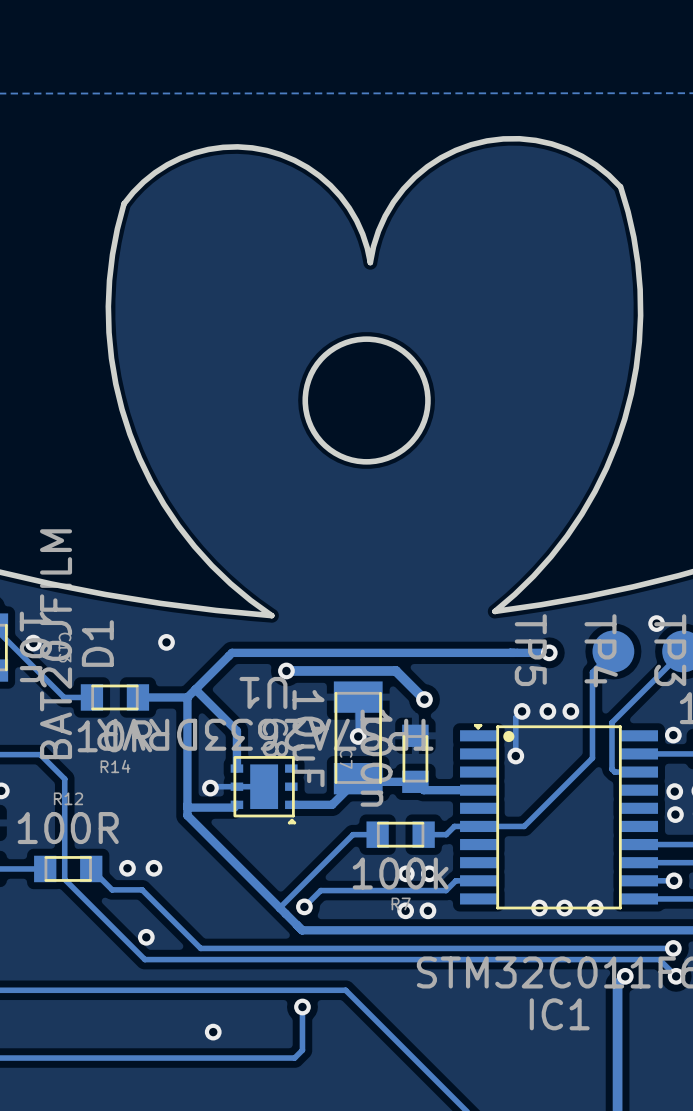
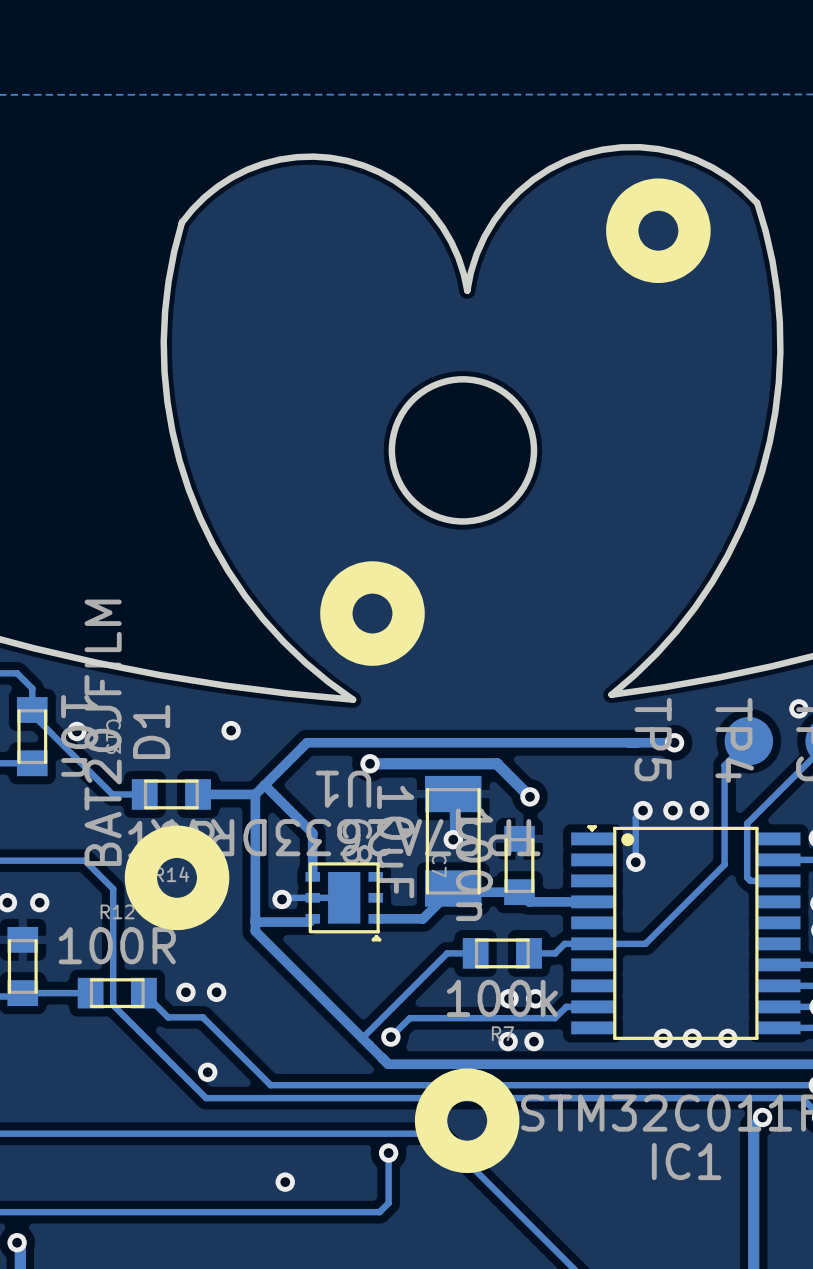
drawing: none -> [606, 178, 711, 283]
drawing: none -> [320, 561, 425, 666]
drawing: none -> [124, 825, 230, 931]
drawing: none -> [414, 1068, 520, 1174]

